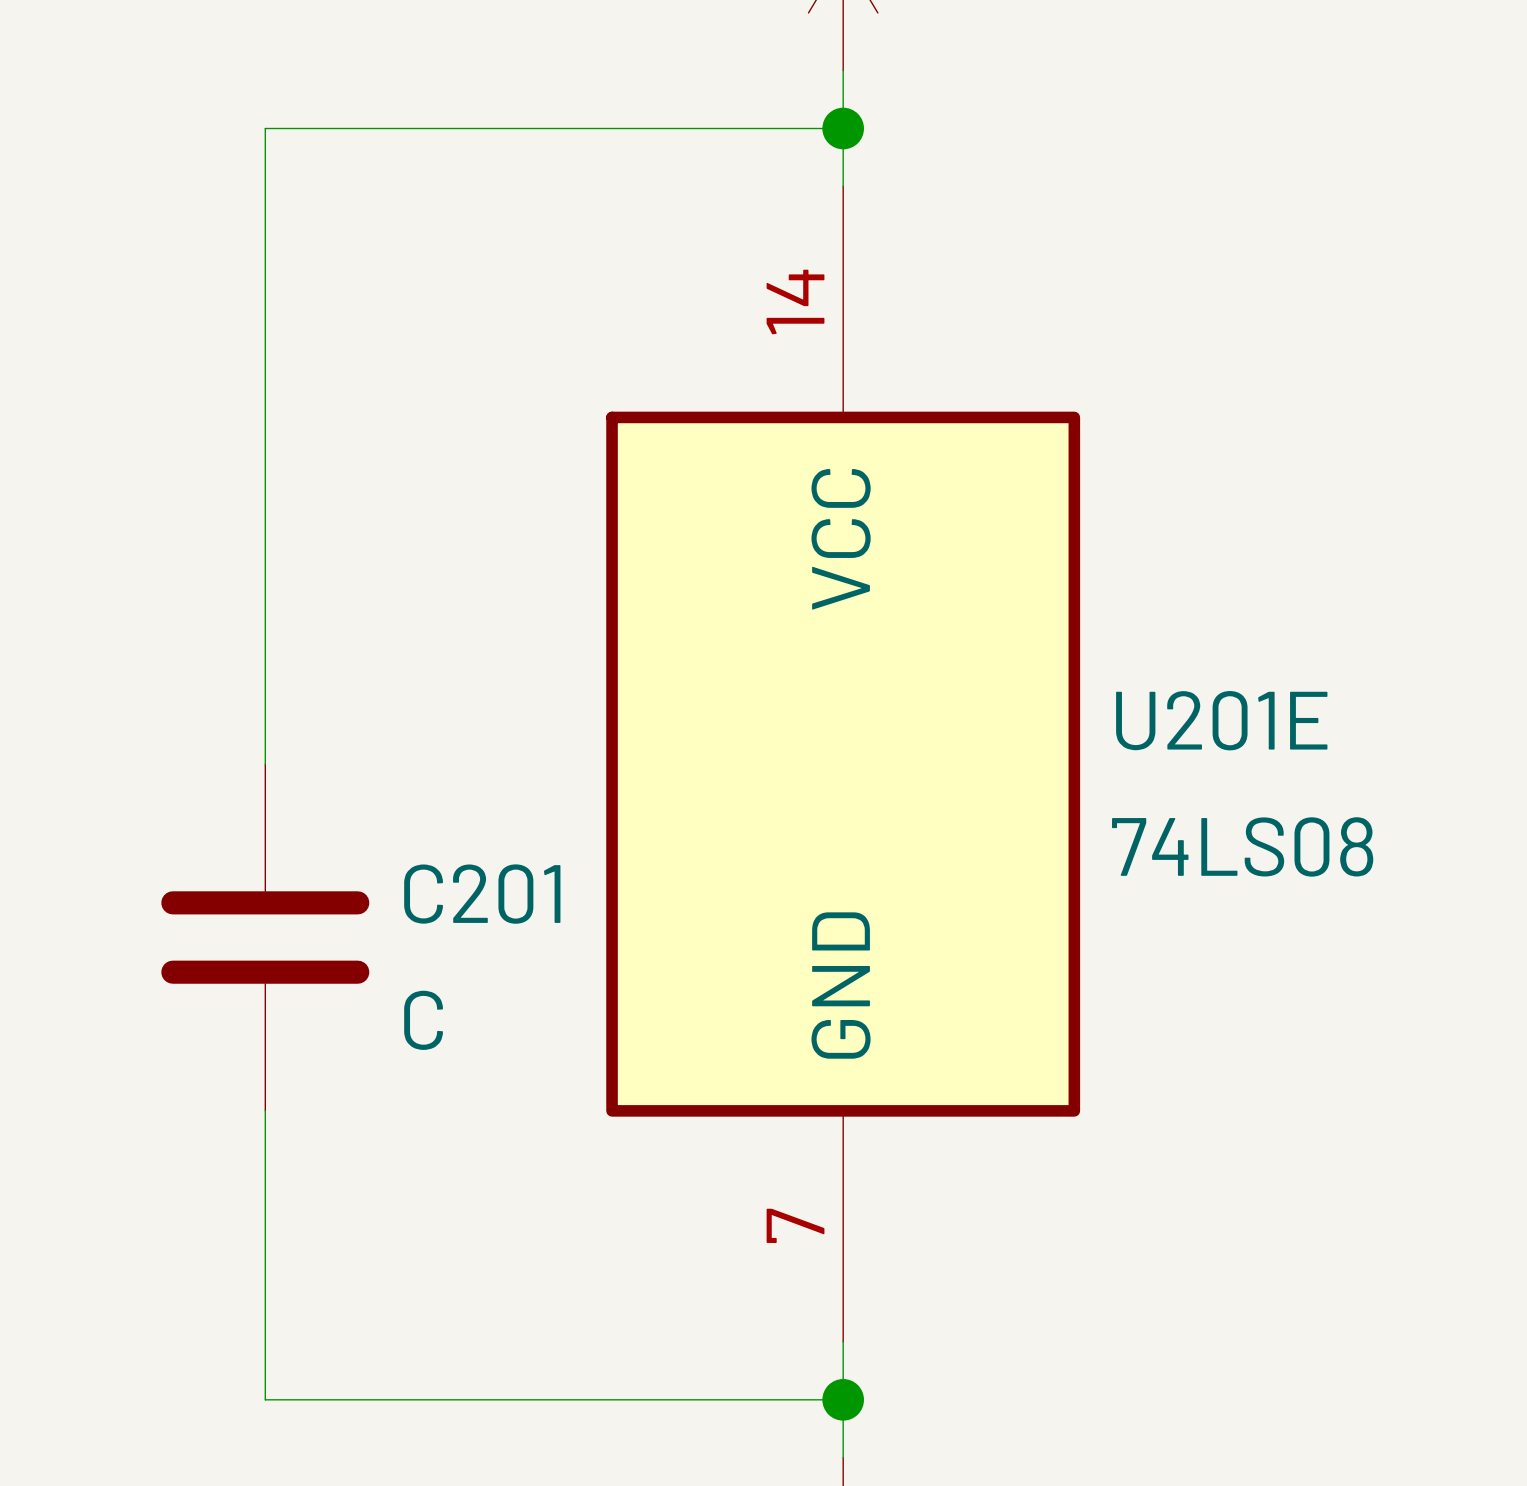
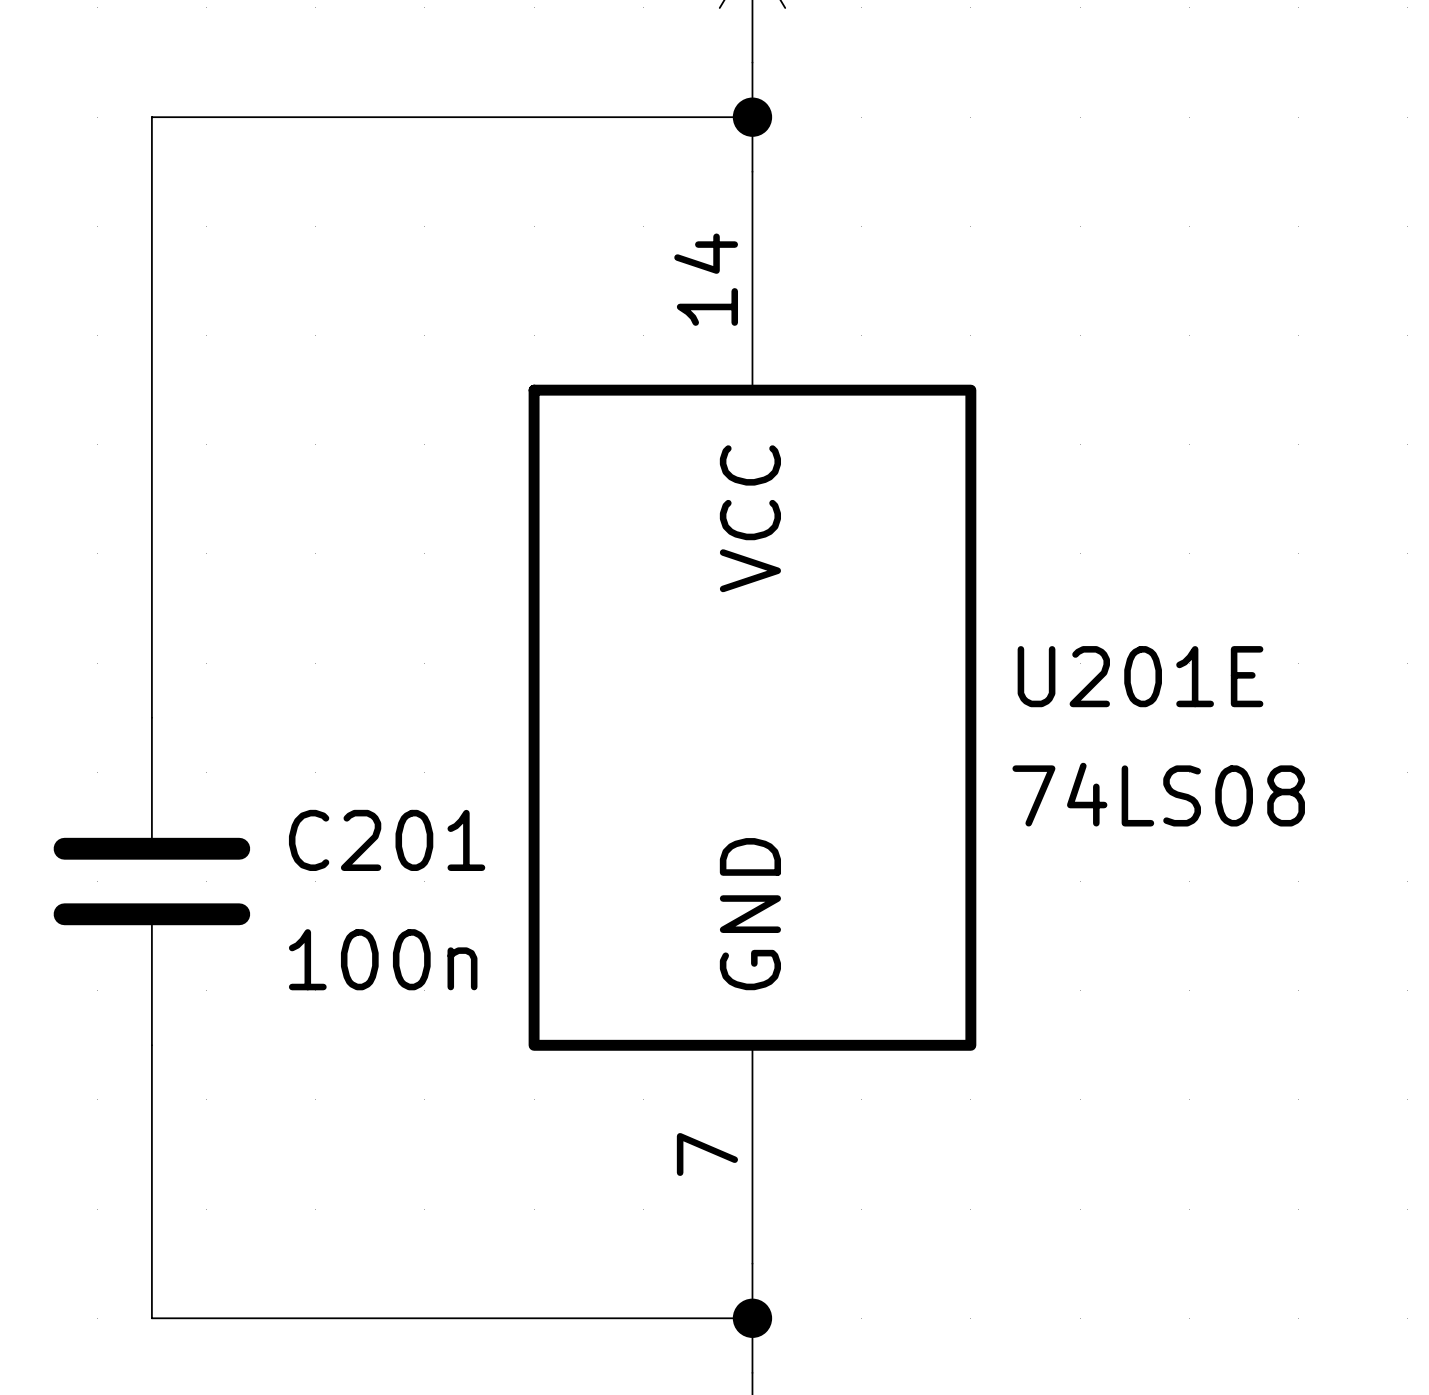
wire: (265, 128) (265, 764) -> (206, 117) (151, 117) (151, 717)
C201 position: (265, 937) -> (151, 881)
C201 value: C (423, 1020) -> 100n (383, 959)
wire: (265, 1110) (265, 1399) -> (151, 1045) (151, 1318) (206, 1318)

